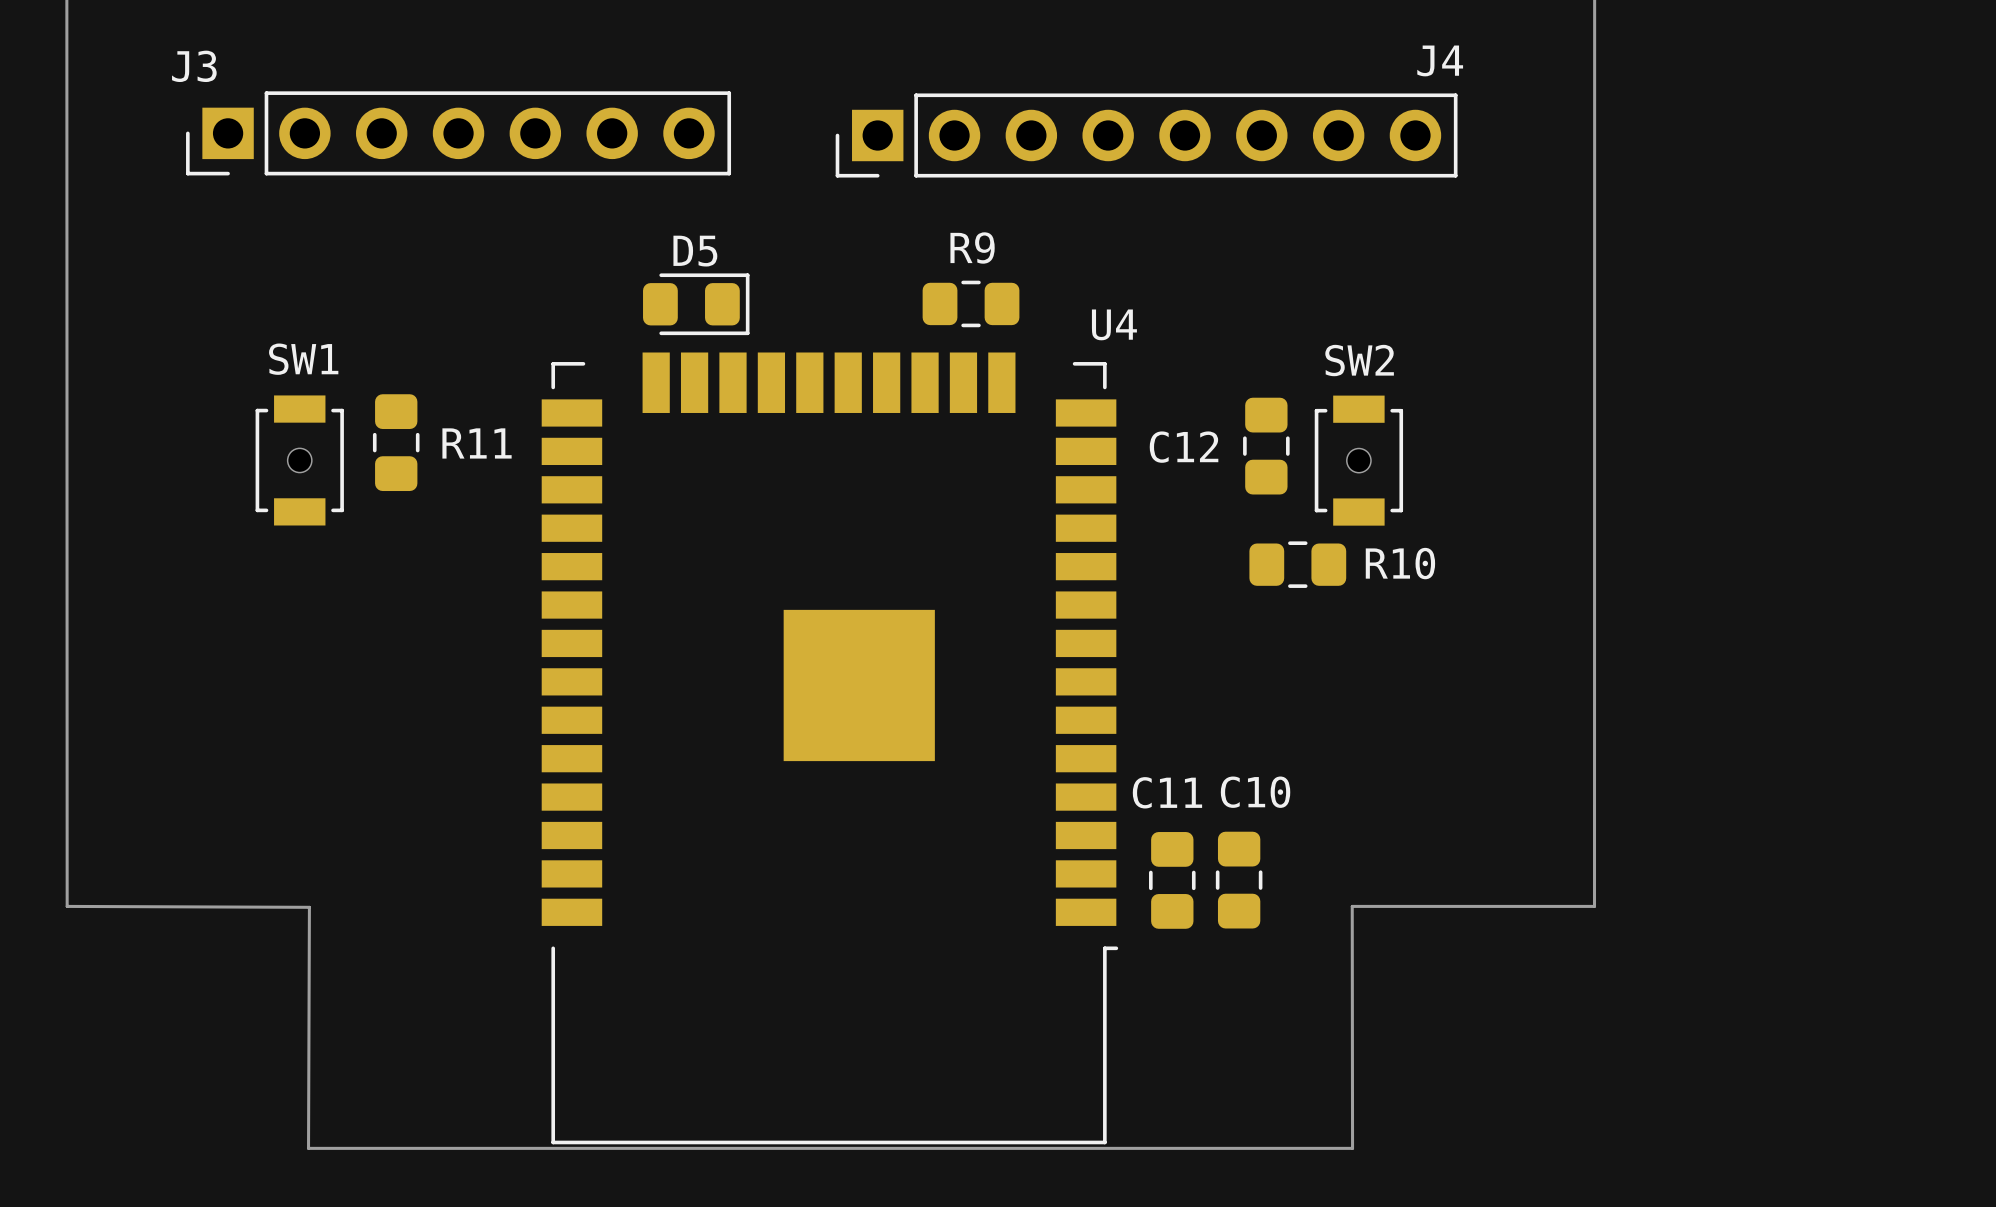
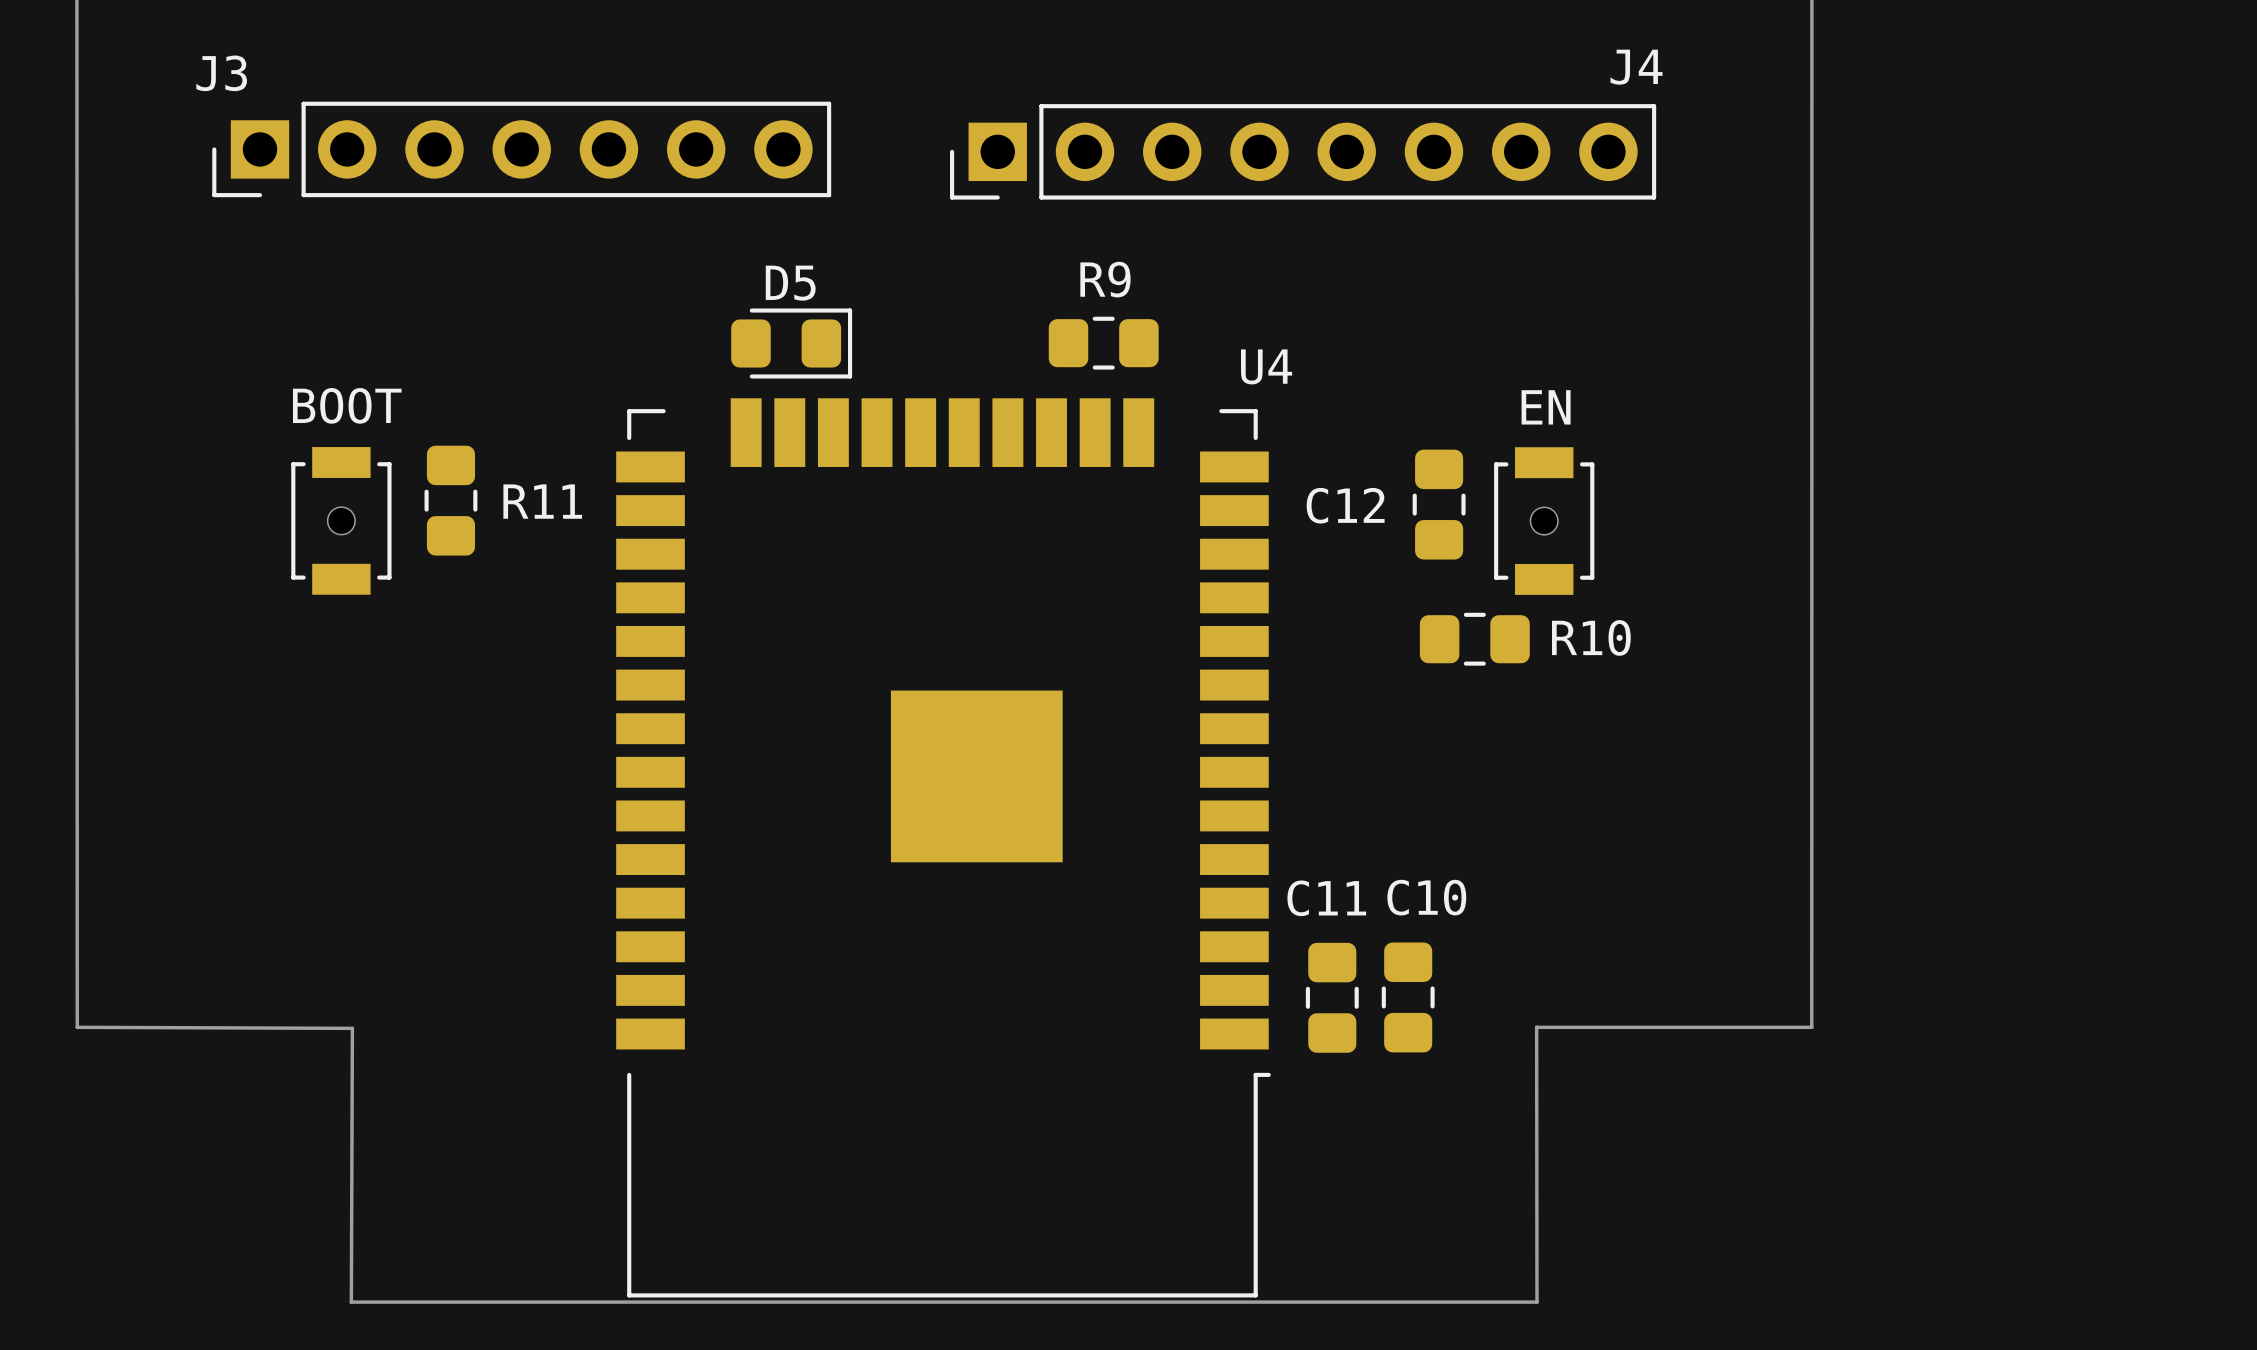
SW1 name: SW1 (303, 359) -> BOOT (347, 405)
SW2 name: SW2 (1359, 360) -> EN (1546, 407)

